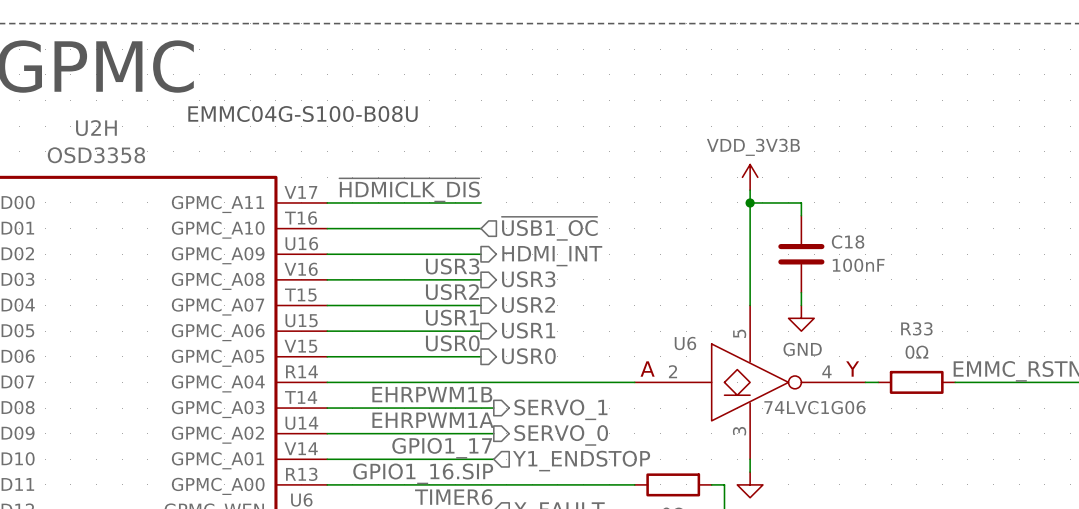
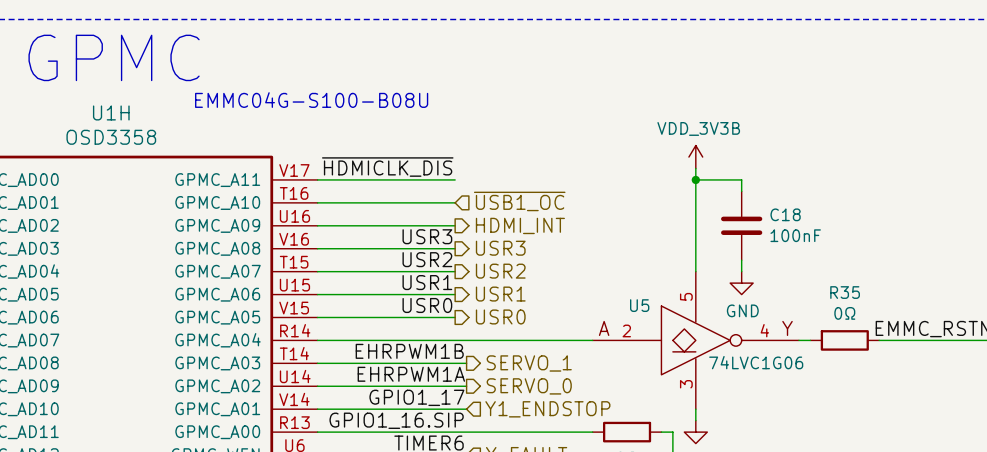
U2H name: U2H (96, 128) -> U1H (111, 112)
R33 name: R33 (916, 328) -> R35 (845, 292)
U6 name: U6 (685, 343) -> U5 (639, 305)

